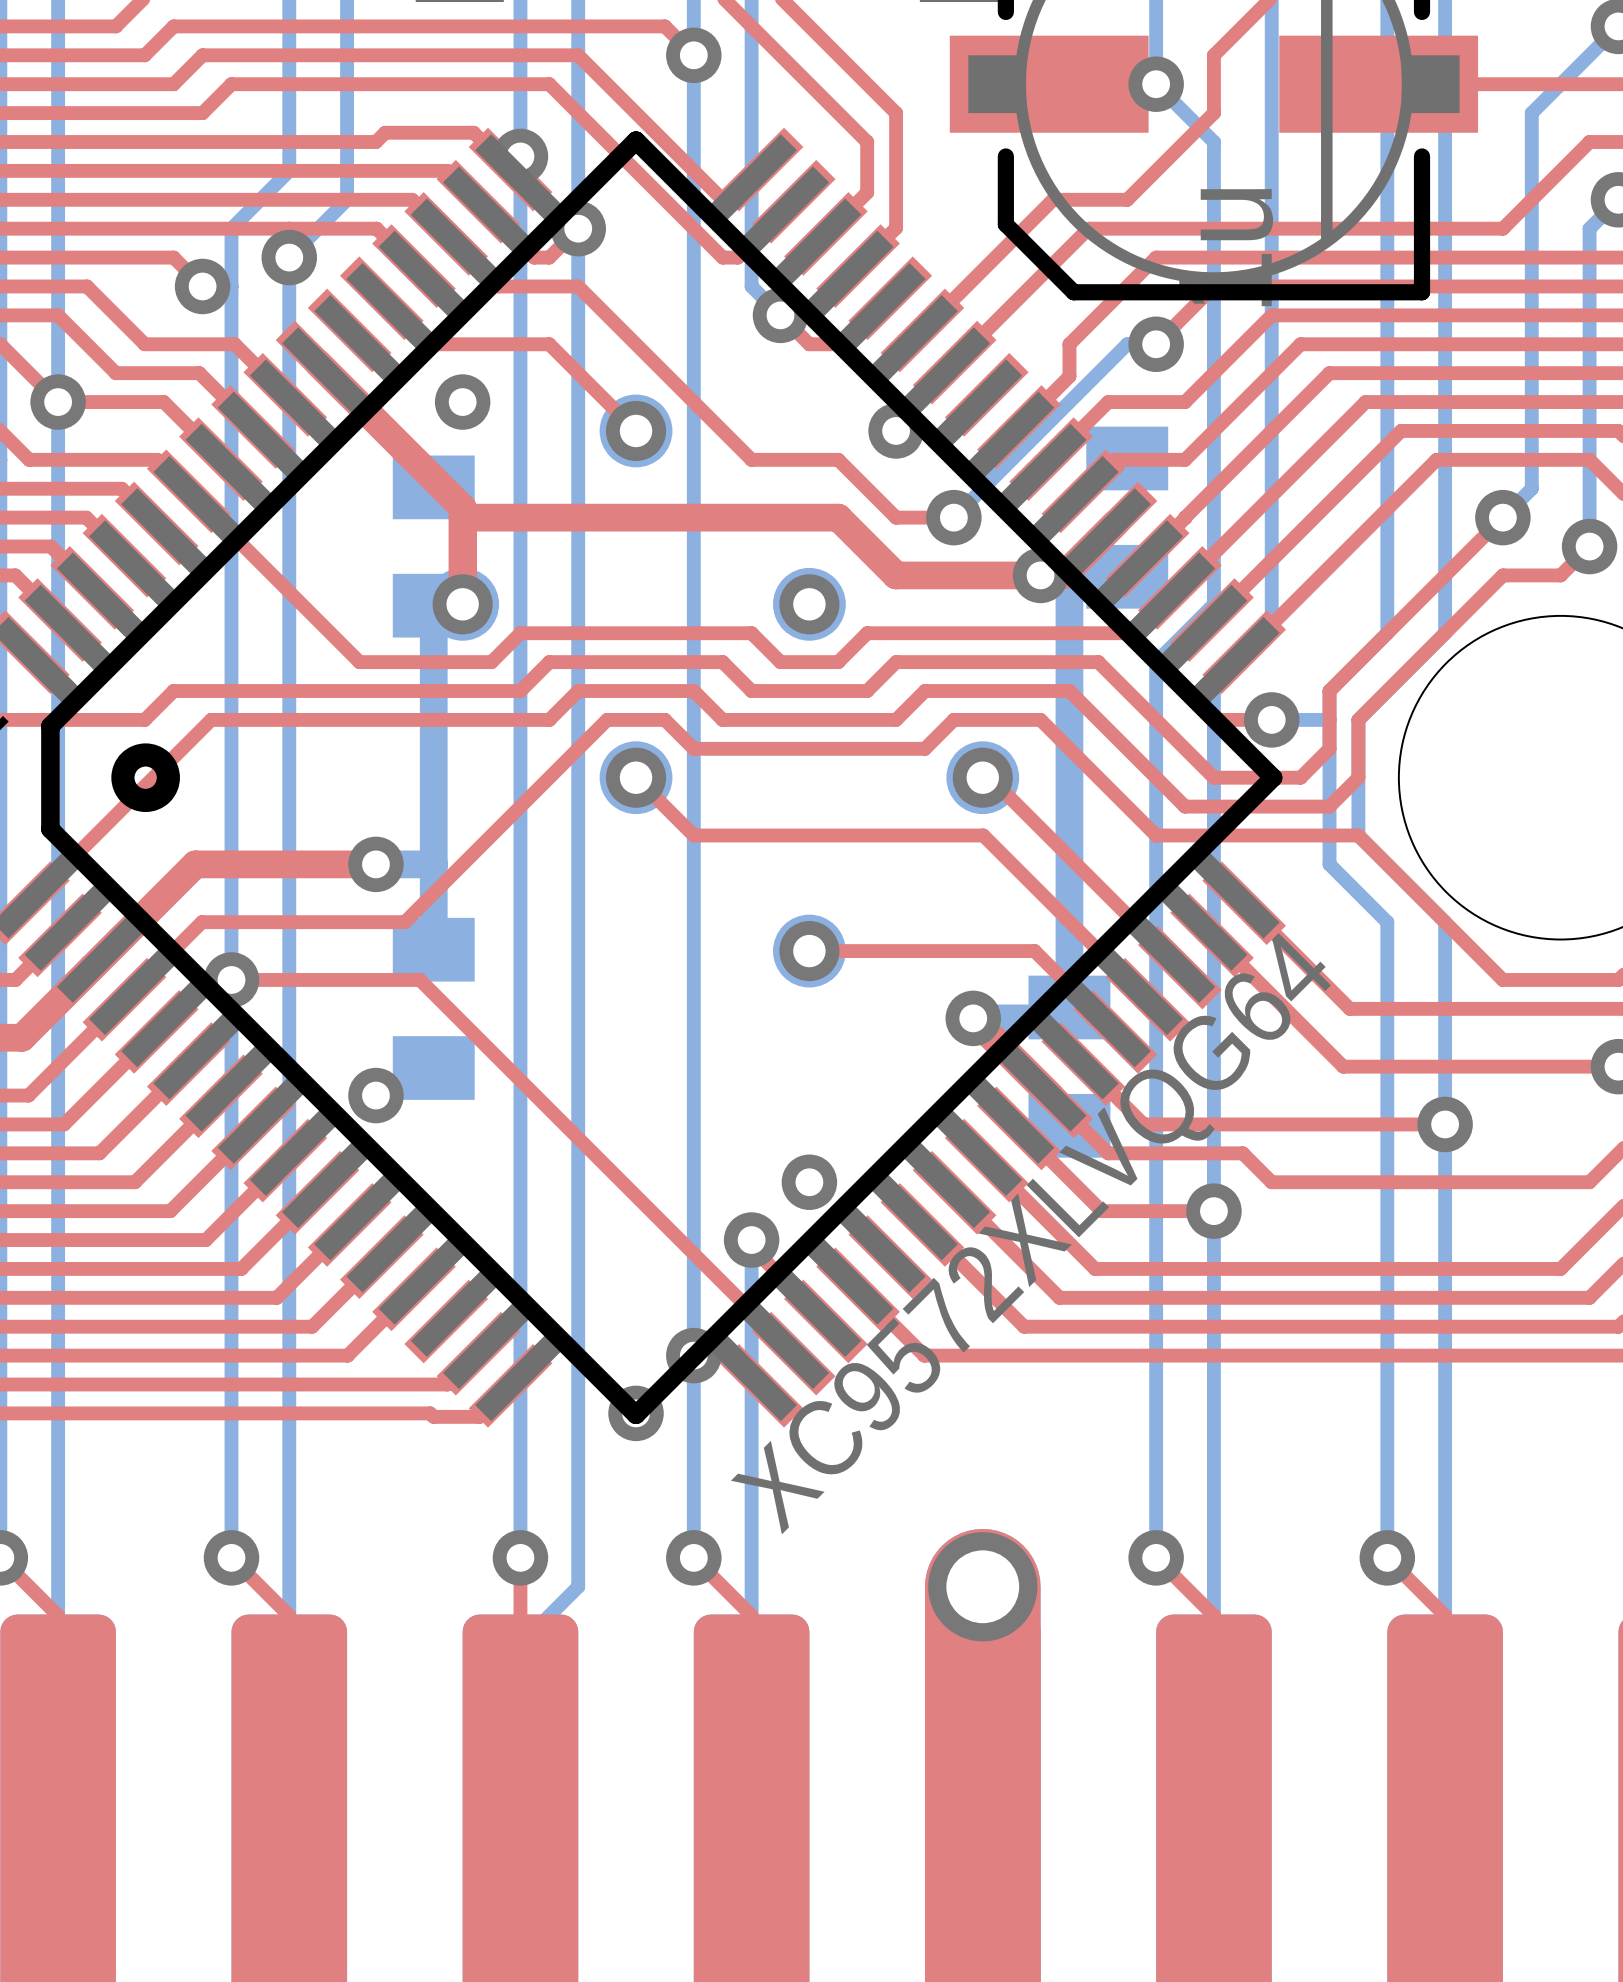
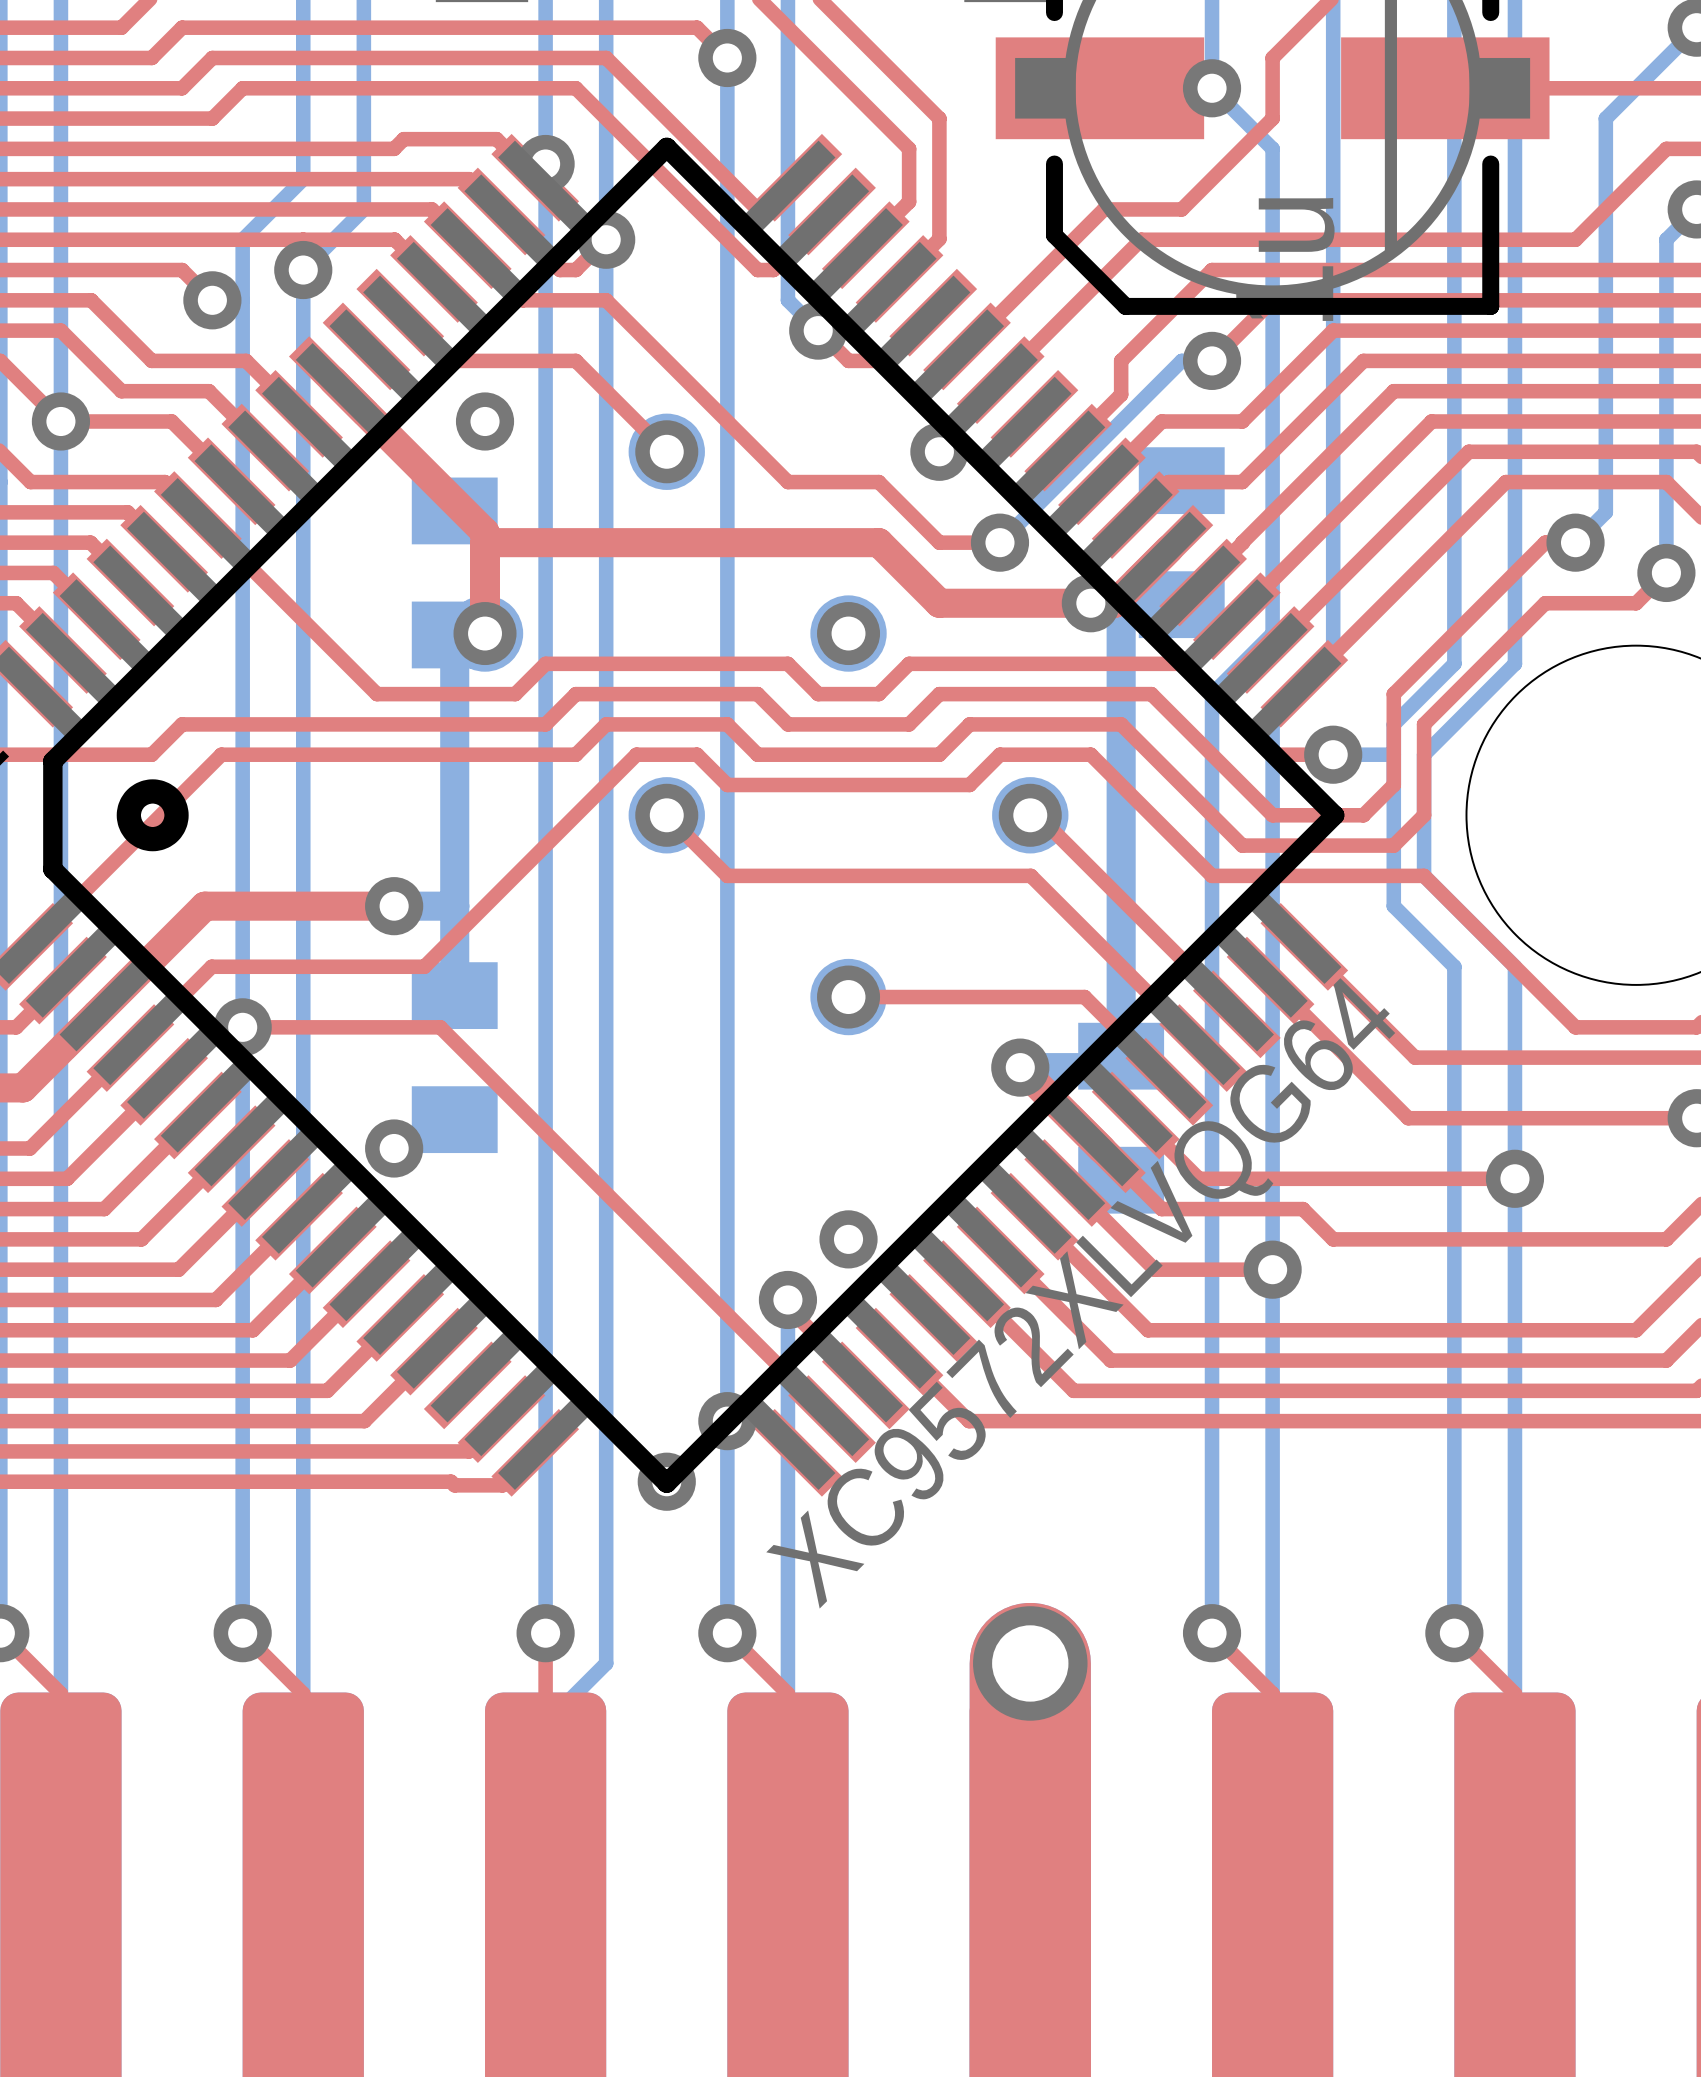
top track: (1502, 517) (1329, 691) -> (1575, 542) (1545, 542) (1393, 694) (1393, 724)
top track: (1502, 575) (1358, 719) -> (1575, 603) (1545, 603) (1424, 724) (1424, 754)

